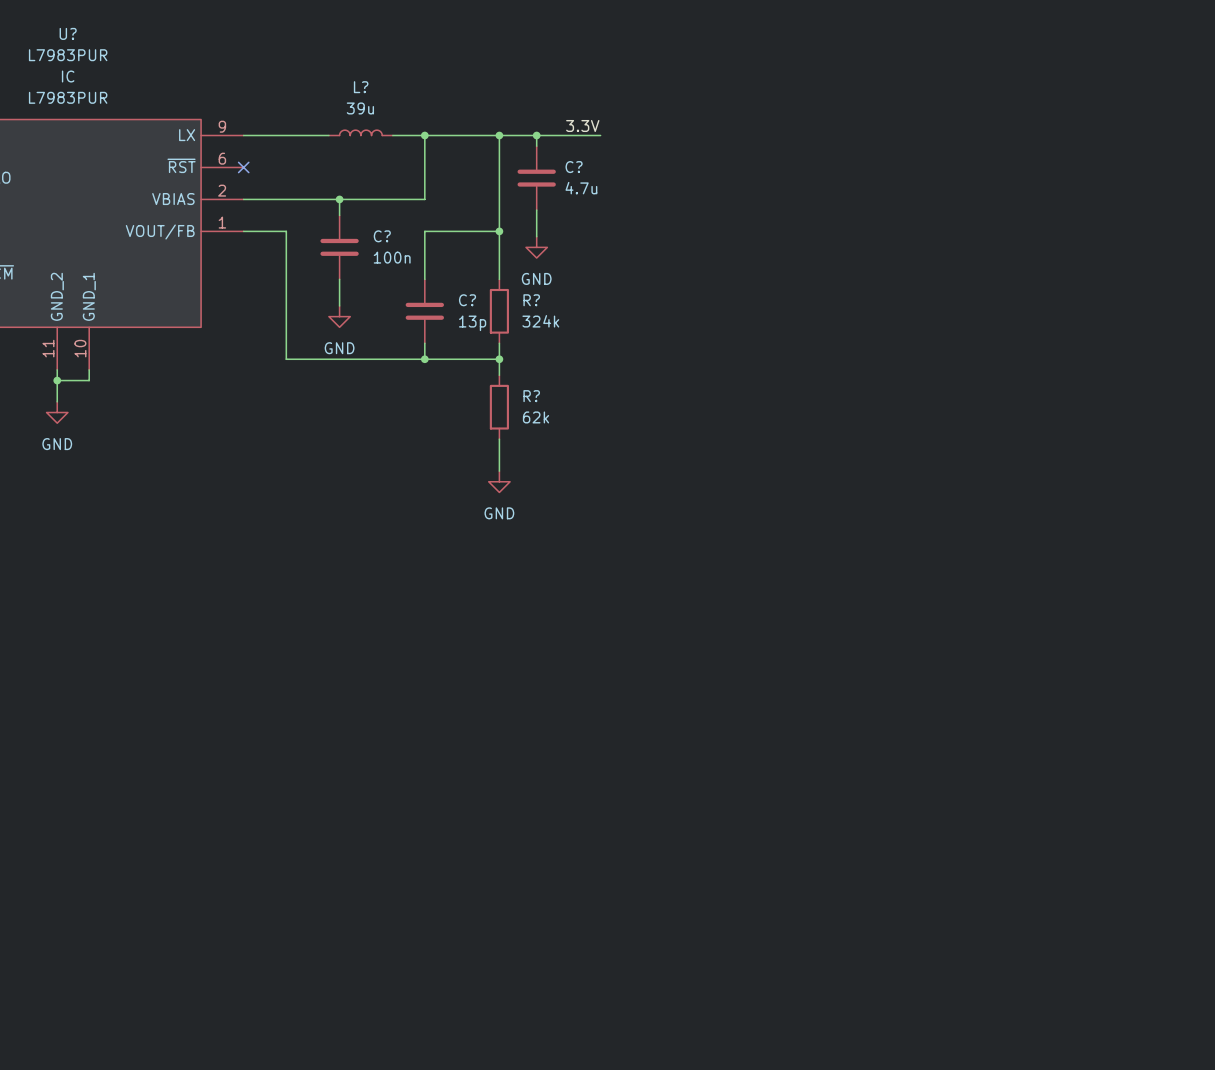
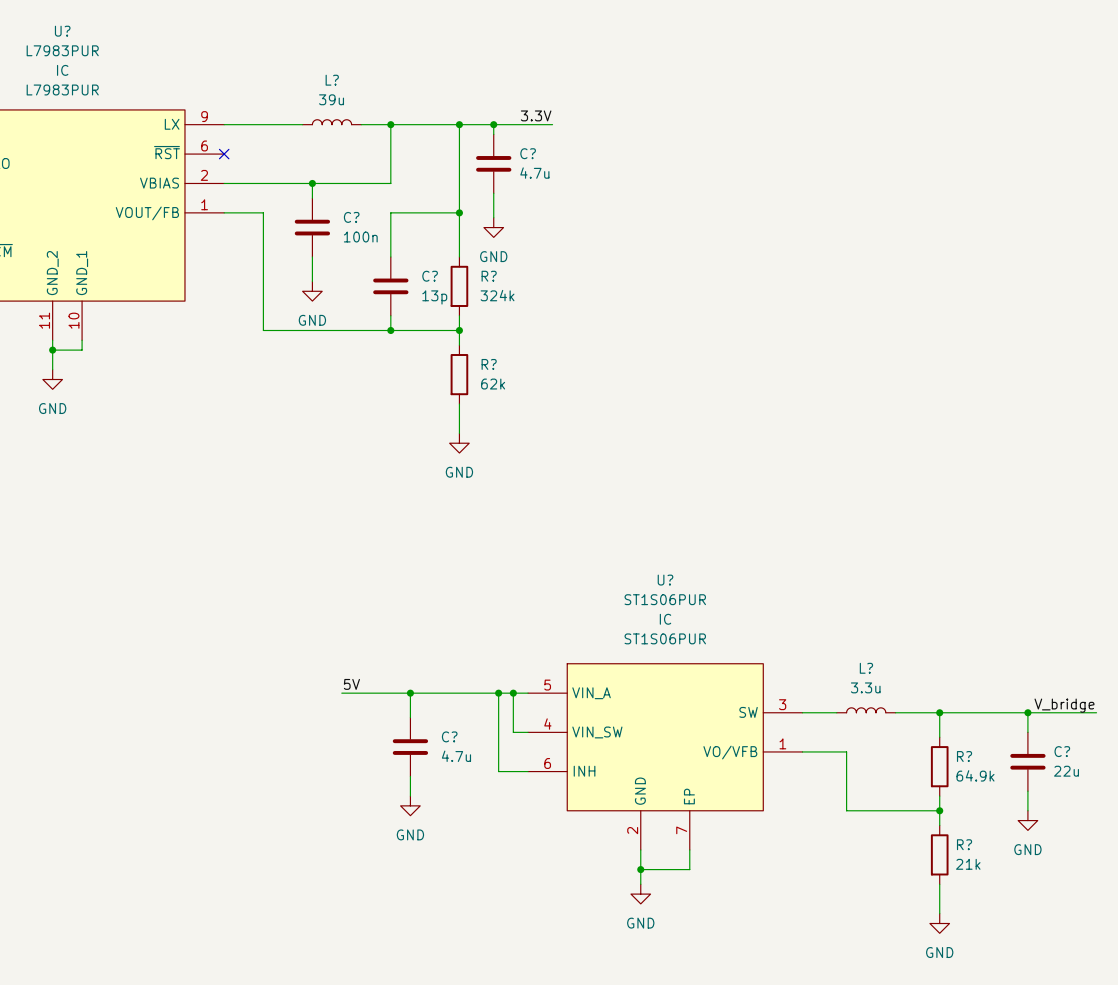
label: none -> 5V (351, 684)
wire: none -> (341, 693) (528, 693)
wire: none -> (410, 693) (410, 717)
junction: none -> (410, 693)
wire: none -> (498, 693) (498, 771) (528, 771)
junction: none -> (498, 693)
wire: none -> (513, 693) (513, 732) (528, 732)
junction: none -> (513, 693)
label: none -> V_bridge (1064, 705)
L?: none -> 3.3u (866, 710)
wire: none -> (802, 712) (836, 712)
wire: none -> (895, 712) (1096, 712)
wire: none -> (939, 712) (939, 737)
junction: none -> (939, 712)
wire: none -> (1027, 712) (1027, 732)
junction: none -> (1027, 712)
C?: none -> 4.7u (410, 747)
wire: none -> (802, 751) (846, 751) (846, 810) (939, 810)
U?: none -> ST1S06PUR (665, 756)
C?: none -> 22u (1027, 761)
R?: none -> 64.9k (939, 766)
wire: none -> (410, 776) (410, 796)
wire: none -> (1027, 791) (1027, 810)
wire: none -> (939, 796) (939, 825)
power symbol: none -> GND (410, 805)
junction: none -> (939, 810)
power symbol: none -> GND (1027, 820)
wire: none -> (640, 849) (640, 884)
wire: none -> (689, 849) (689, 869) (640, 869)
R?: none -> 21k (939, 854)
junction: none -> (640, 869)
wire: none -> (939, 884) (939, 913)
power symbol: none -> GND (640, 894)
power symbol: none -> GND (939, 923)

